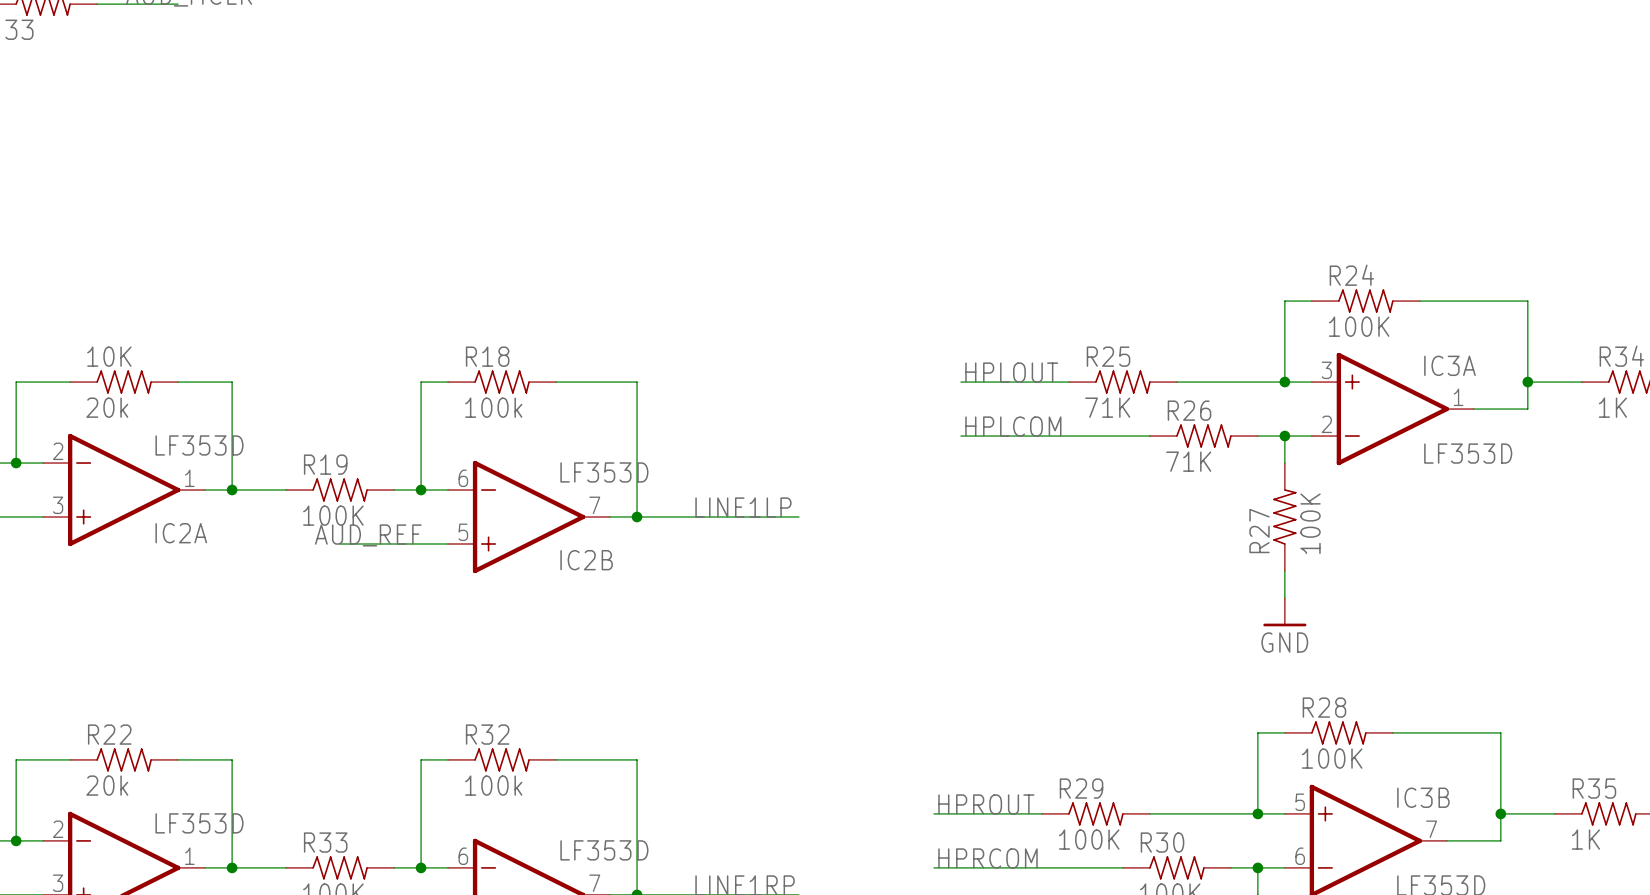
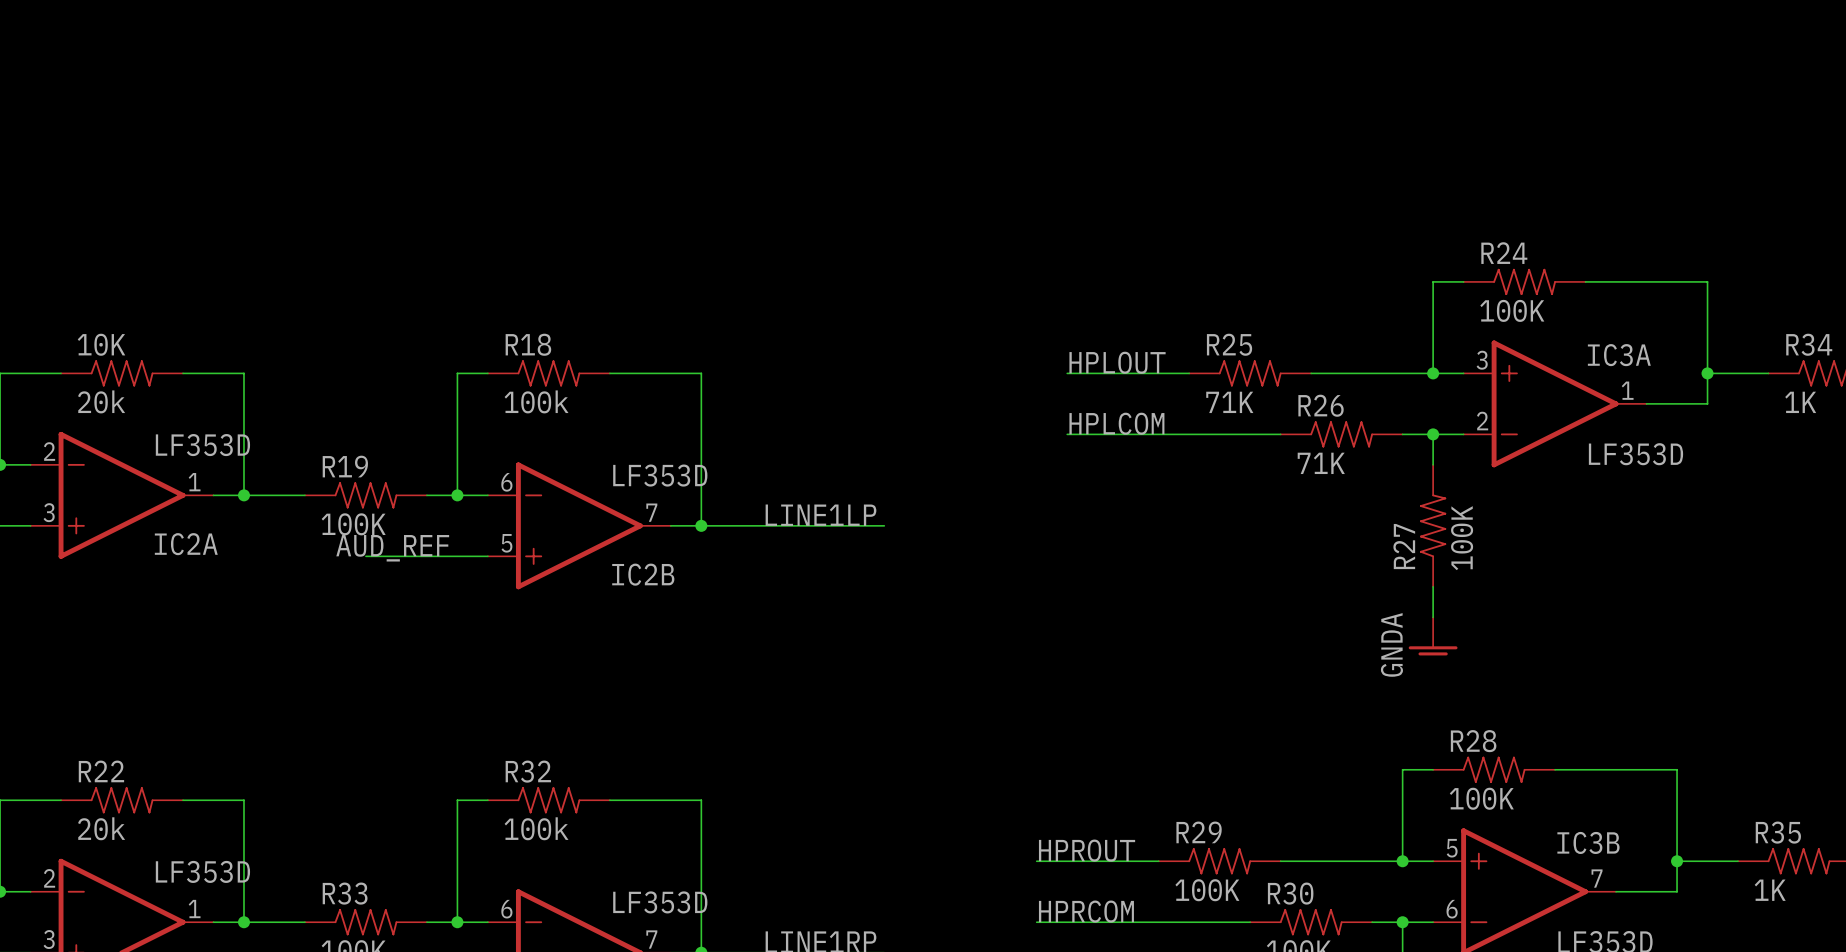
power symbol: GND (1284, 612) -> GNDA (1433, 636)

